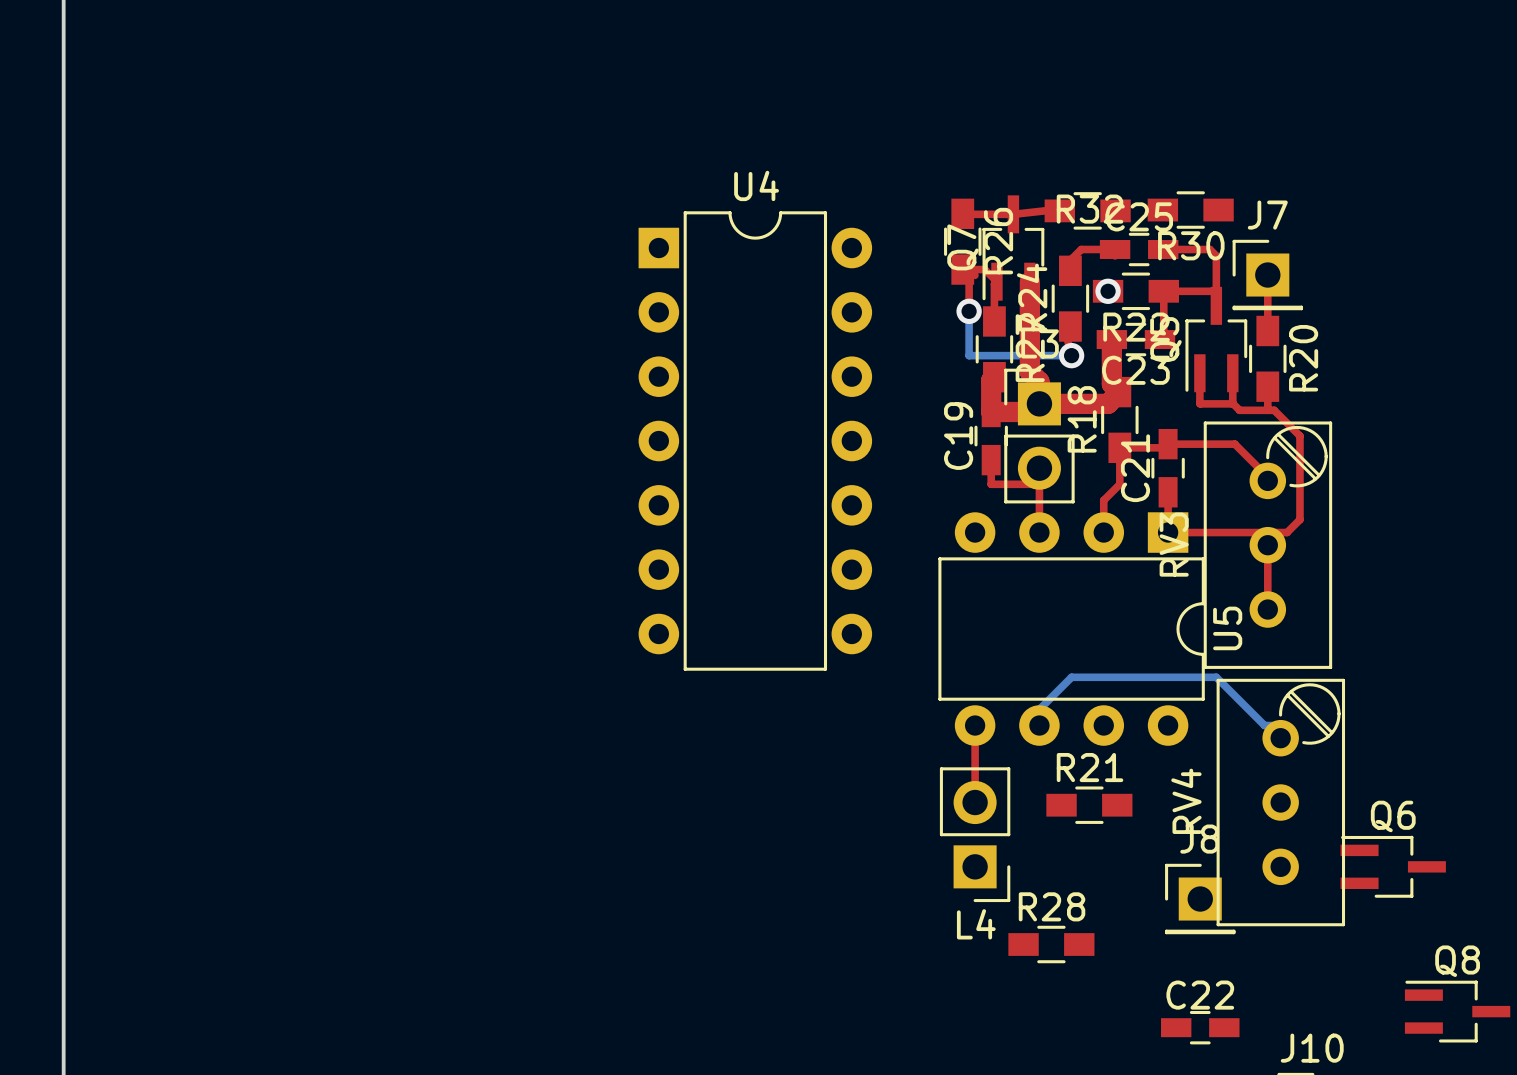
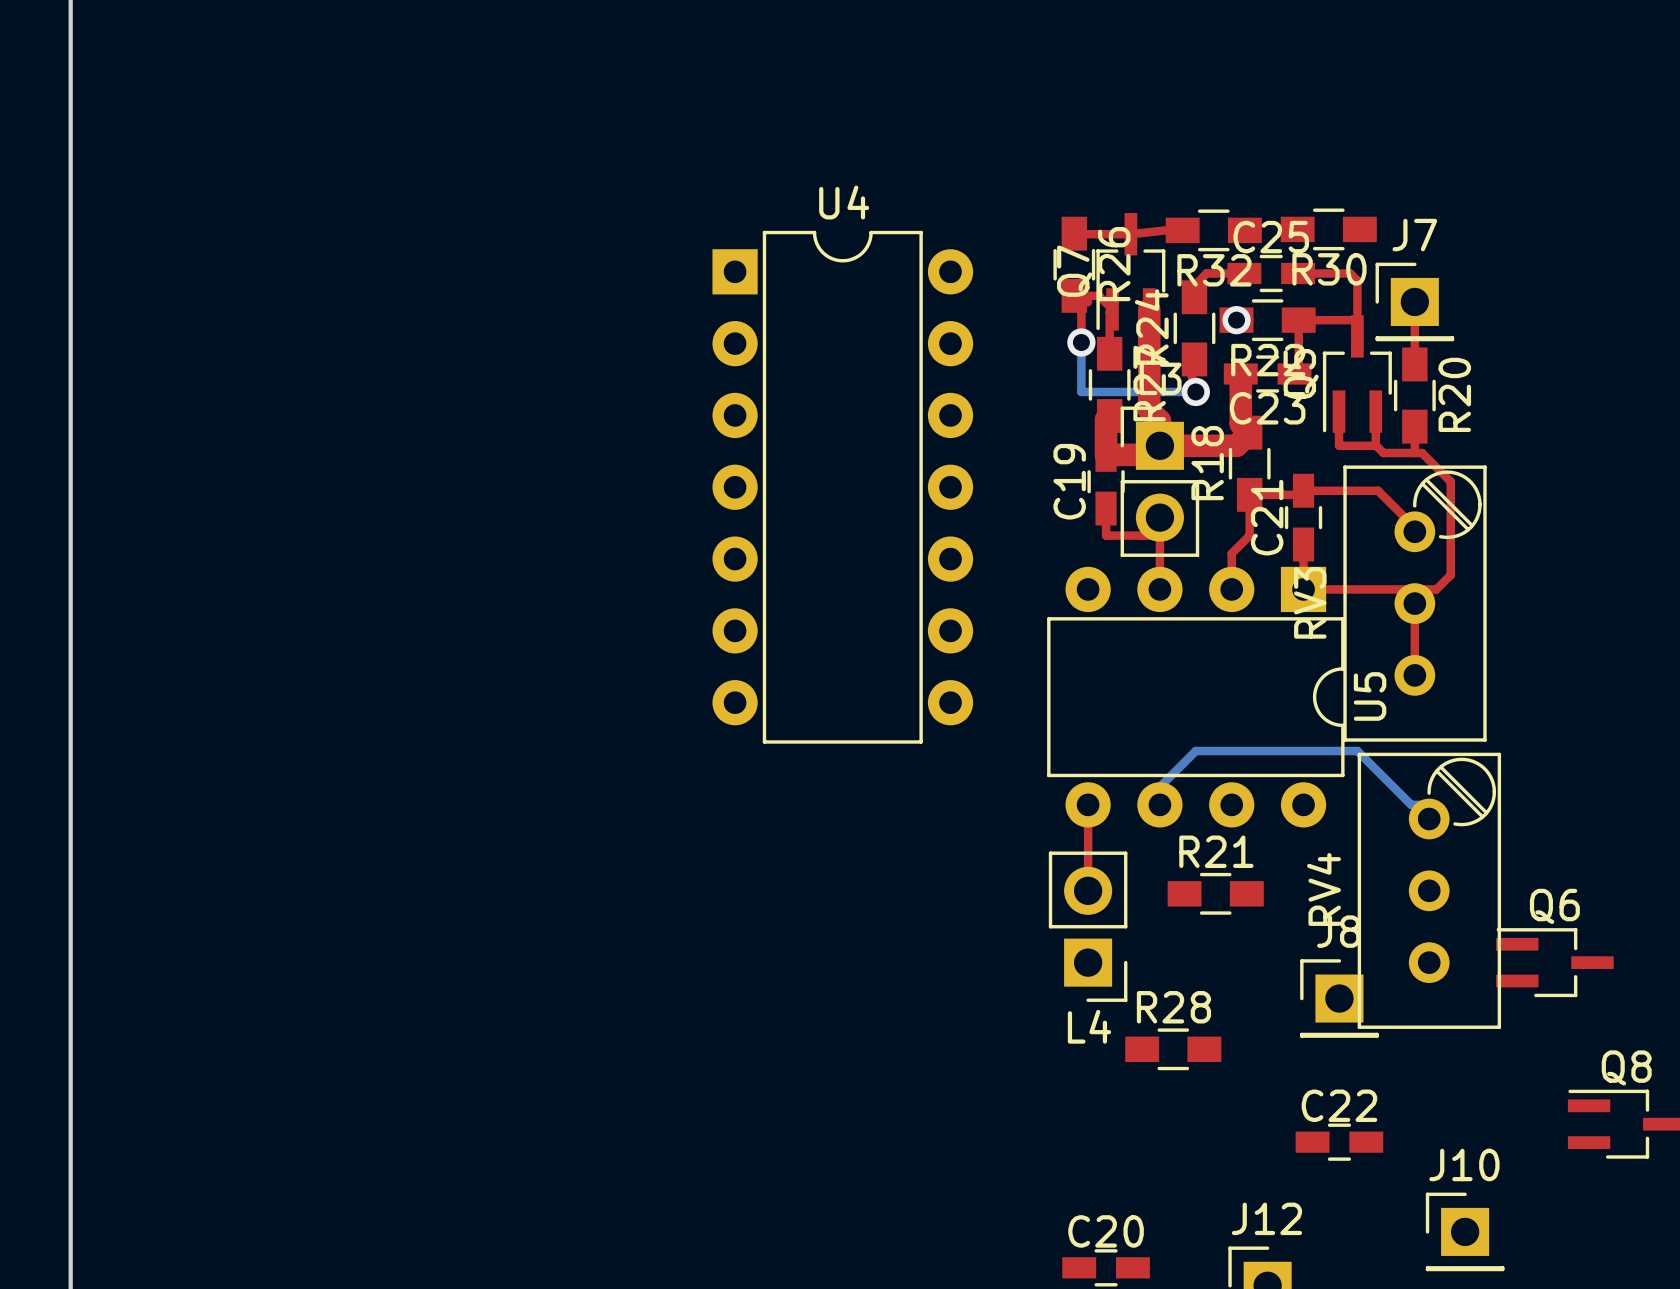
R32 name position: R32 (1090, 209) -> R32 (1214, 270)

